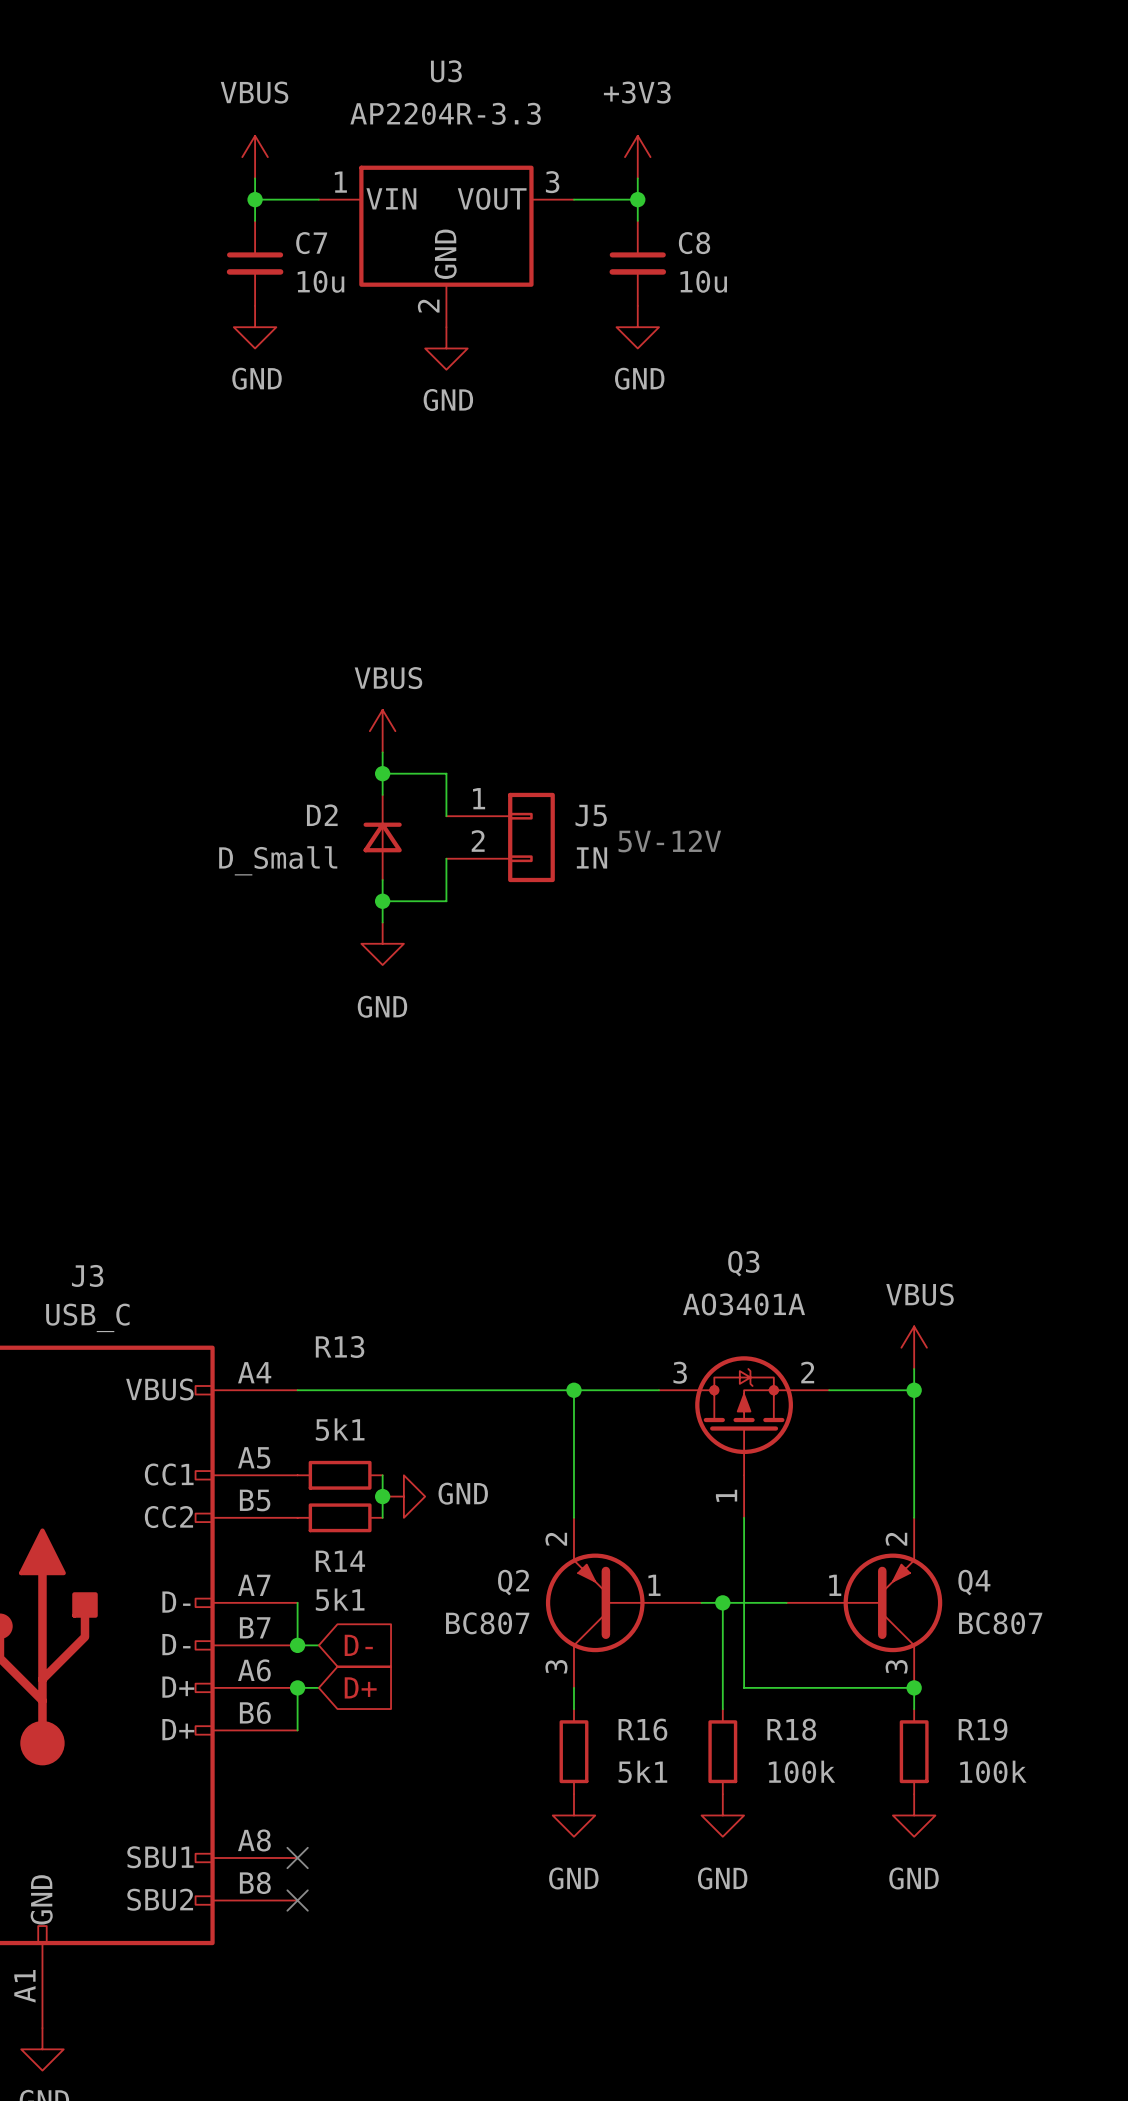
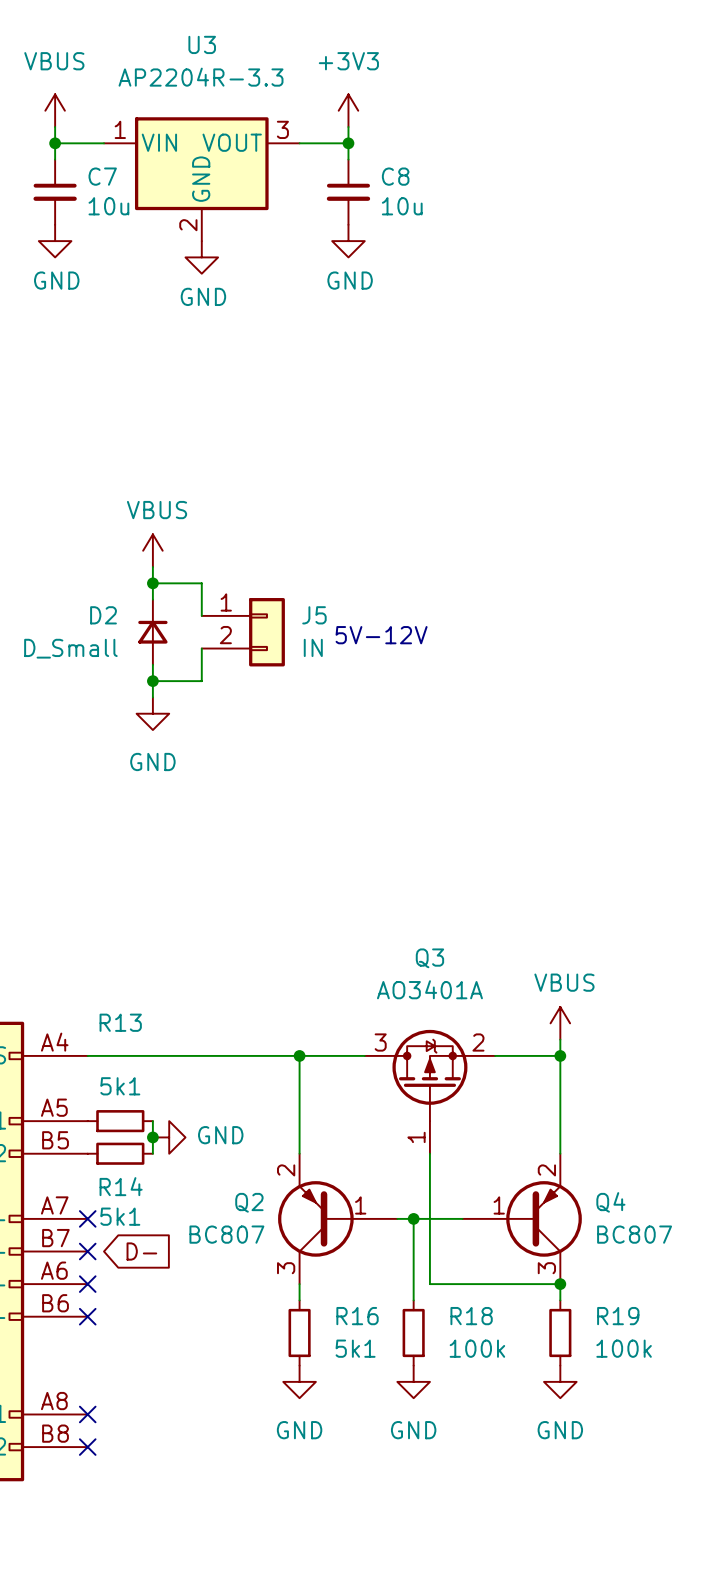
wire: (297, 1602) (297, 1645) (318, 1645) -> none
no-connect mark: none -> (87, 1218)
junction: (297, 1645) -> none
no-connect mark: none -> (87, 1251)
junction: (297, 1687) -> none
no-connect mark: none -> (87, 1284)
wire: (318, 1687) (297, 1687) (297, 1730) -> none
global label: D+ (360, 1687) -> none
no-connect mark: none -> (87, 1316)

